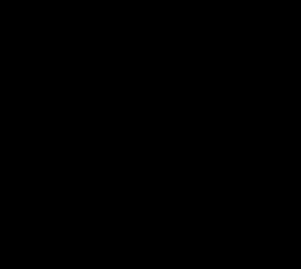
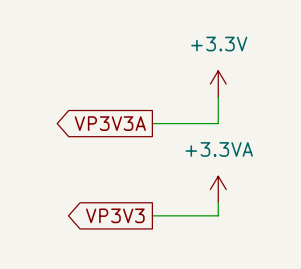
power symbol: none -> +3.3V (218, 84)
wire: none -> (218, 97) (218, 123) (152, 123)
global label: none -> VP3V3A (110, 123)
power symbol: none -> +3.3VA (218, 189)
wire: none -> (218, 202) (218, 215) (152, 215)
global label: none -> VP3V3 (115, 215)

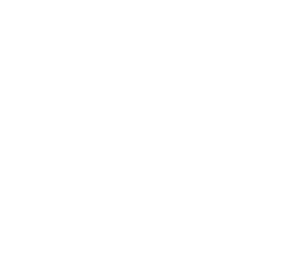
power symbol: +3.3V (218, 84) -> none
wire: (218, 97) (218, 123) (152, 123) -> none
global label: VP3V3A (110, 123) -> none
power symbol: +3.3VA (218, 189) -> none
wire: (218, 202) (218, 215) (152, 215) -> none
global label: VP3V3 (115, 215) -> none

